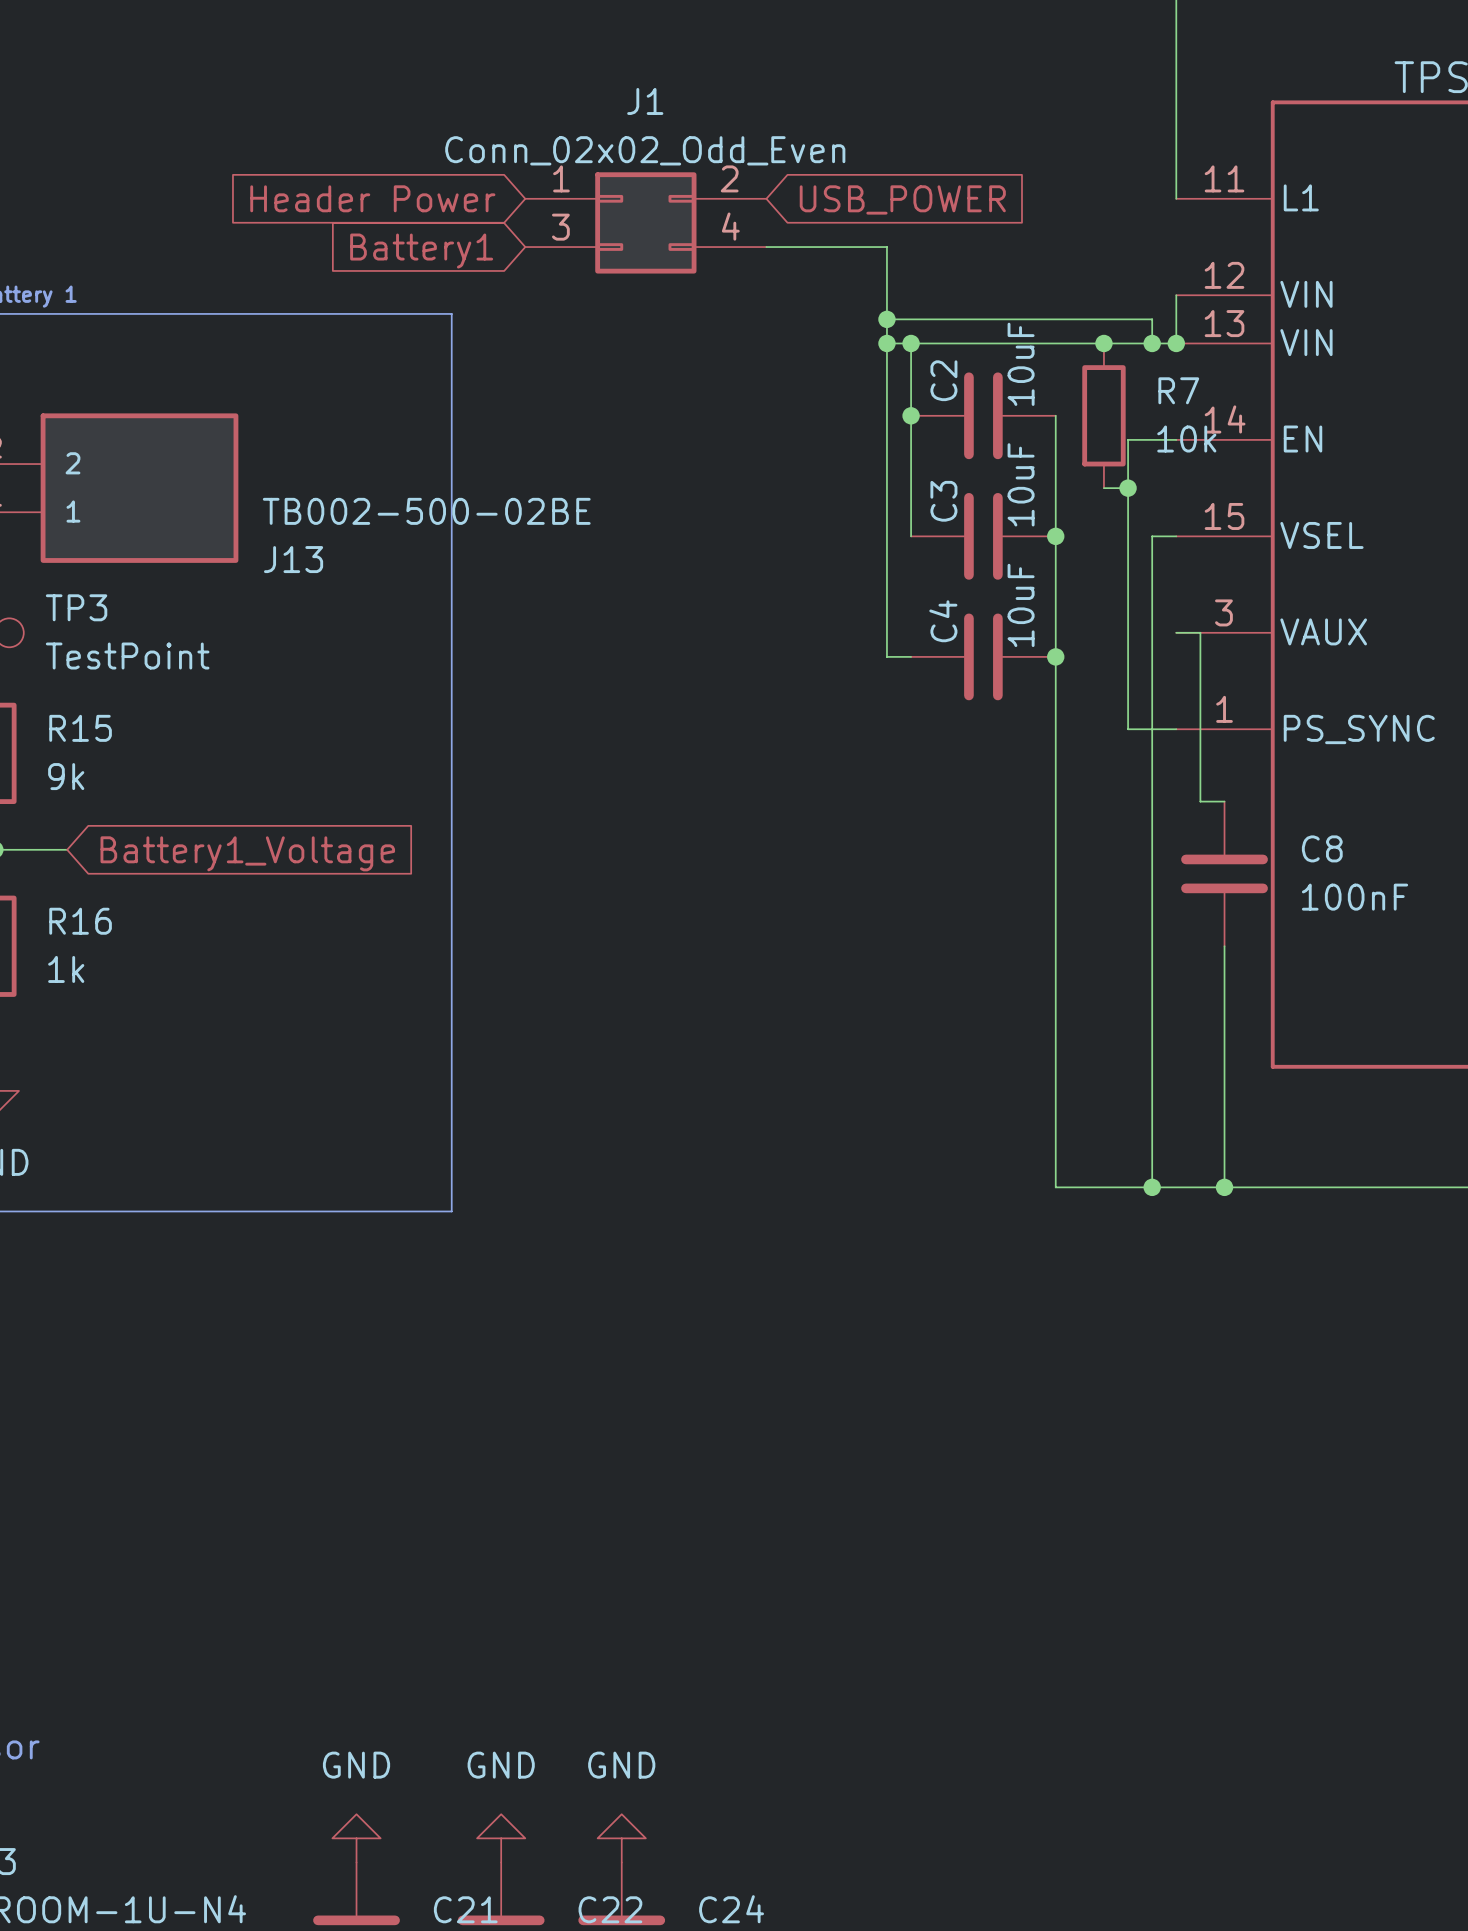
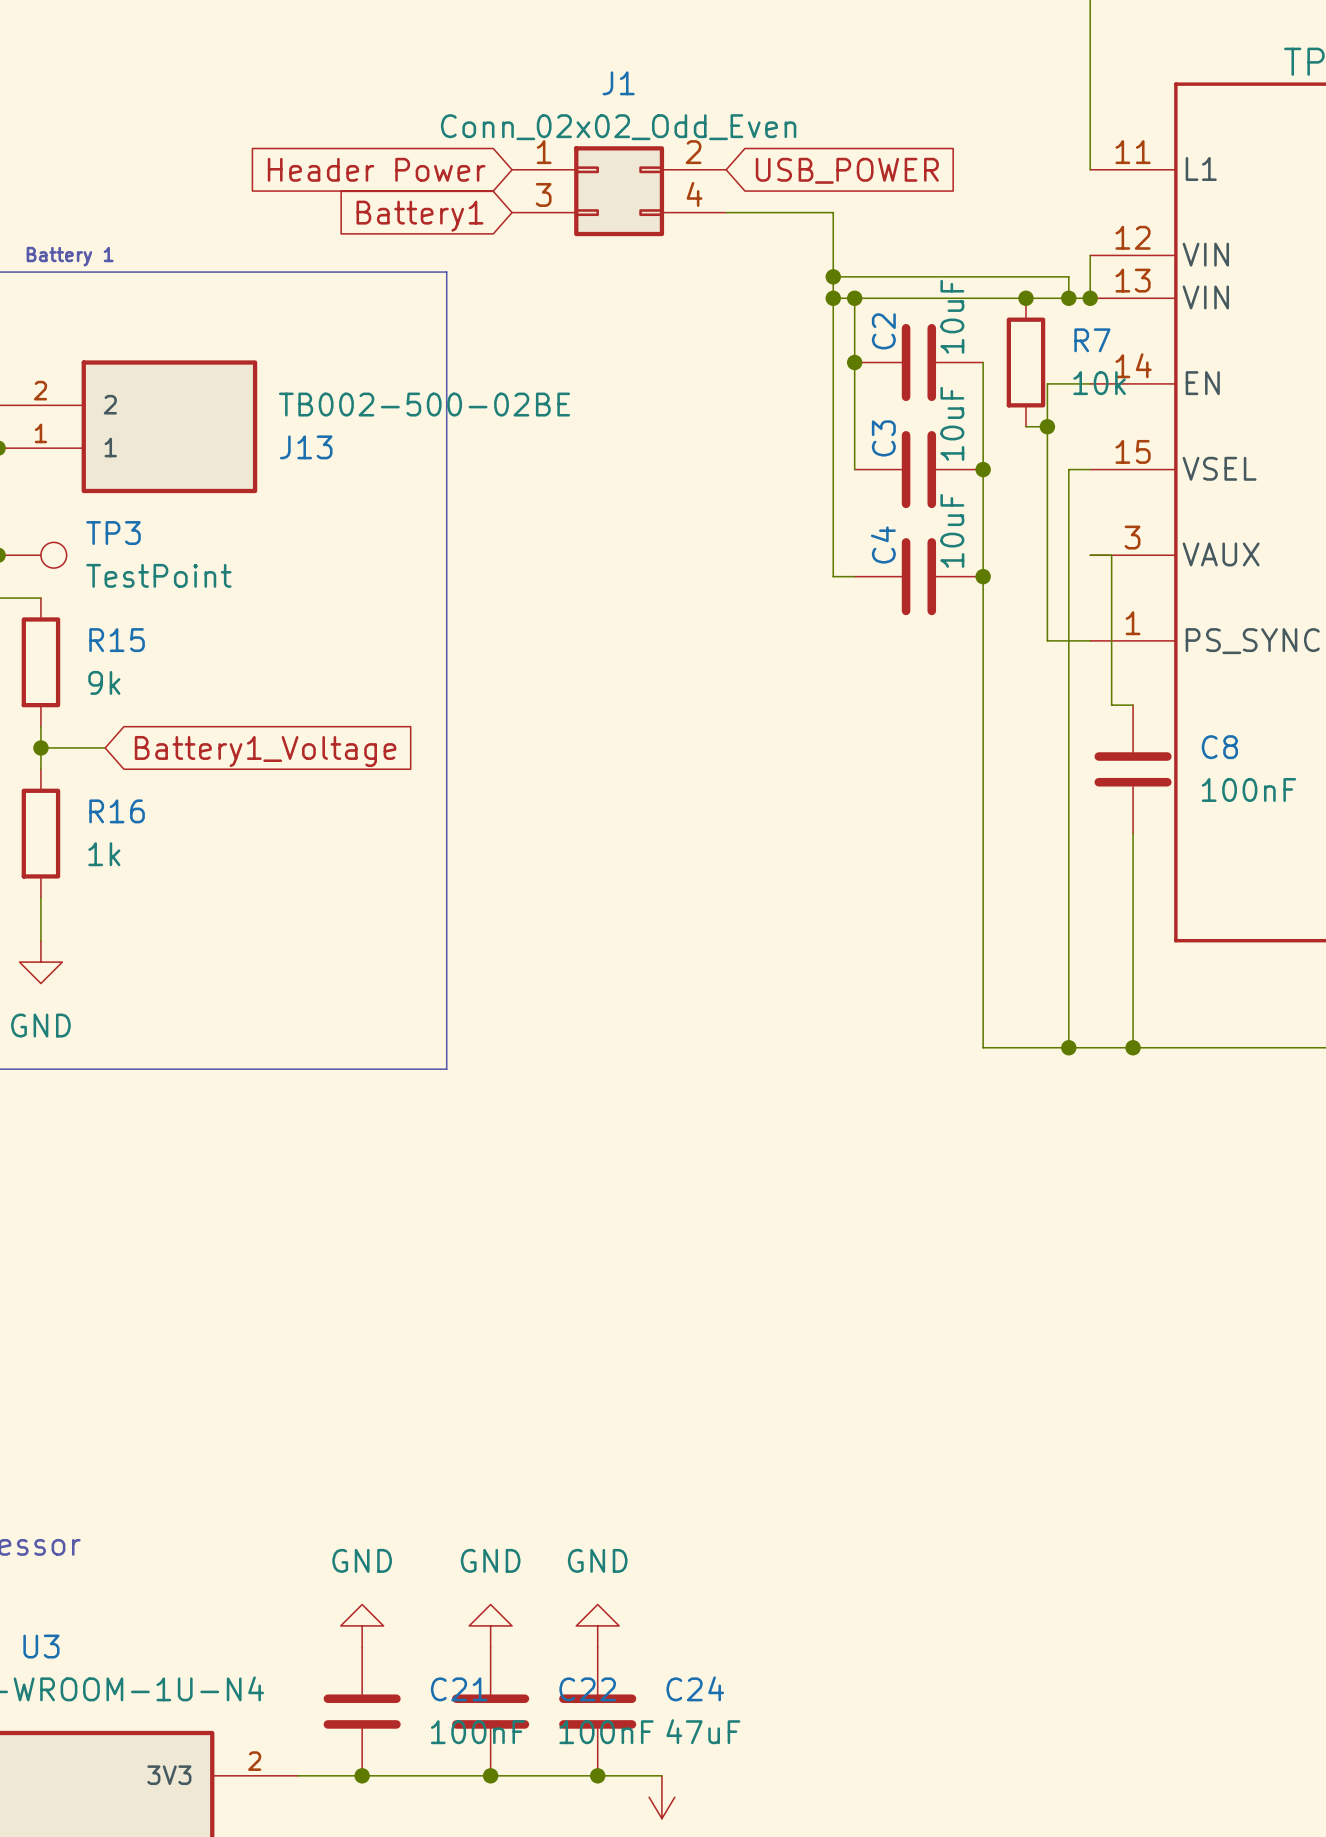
J13 value position: TB002-500-02BE (426, 511) -> TB002-500-02BE (424, 404)
J13 name position: J13 (293, 559) -> J13 (306, 447)

